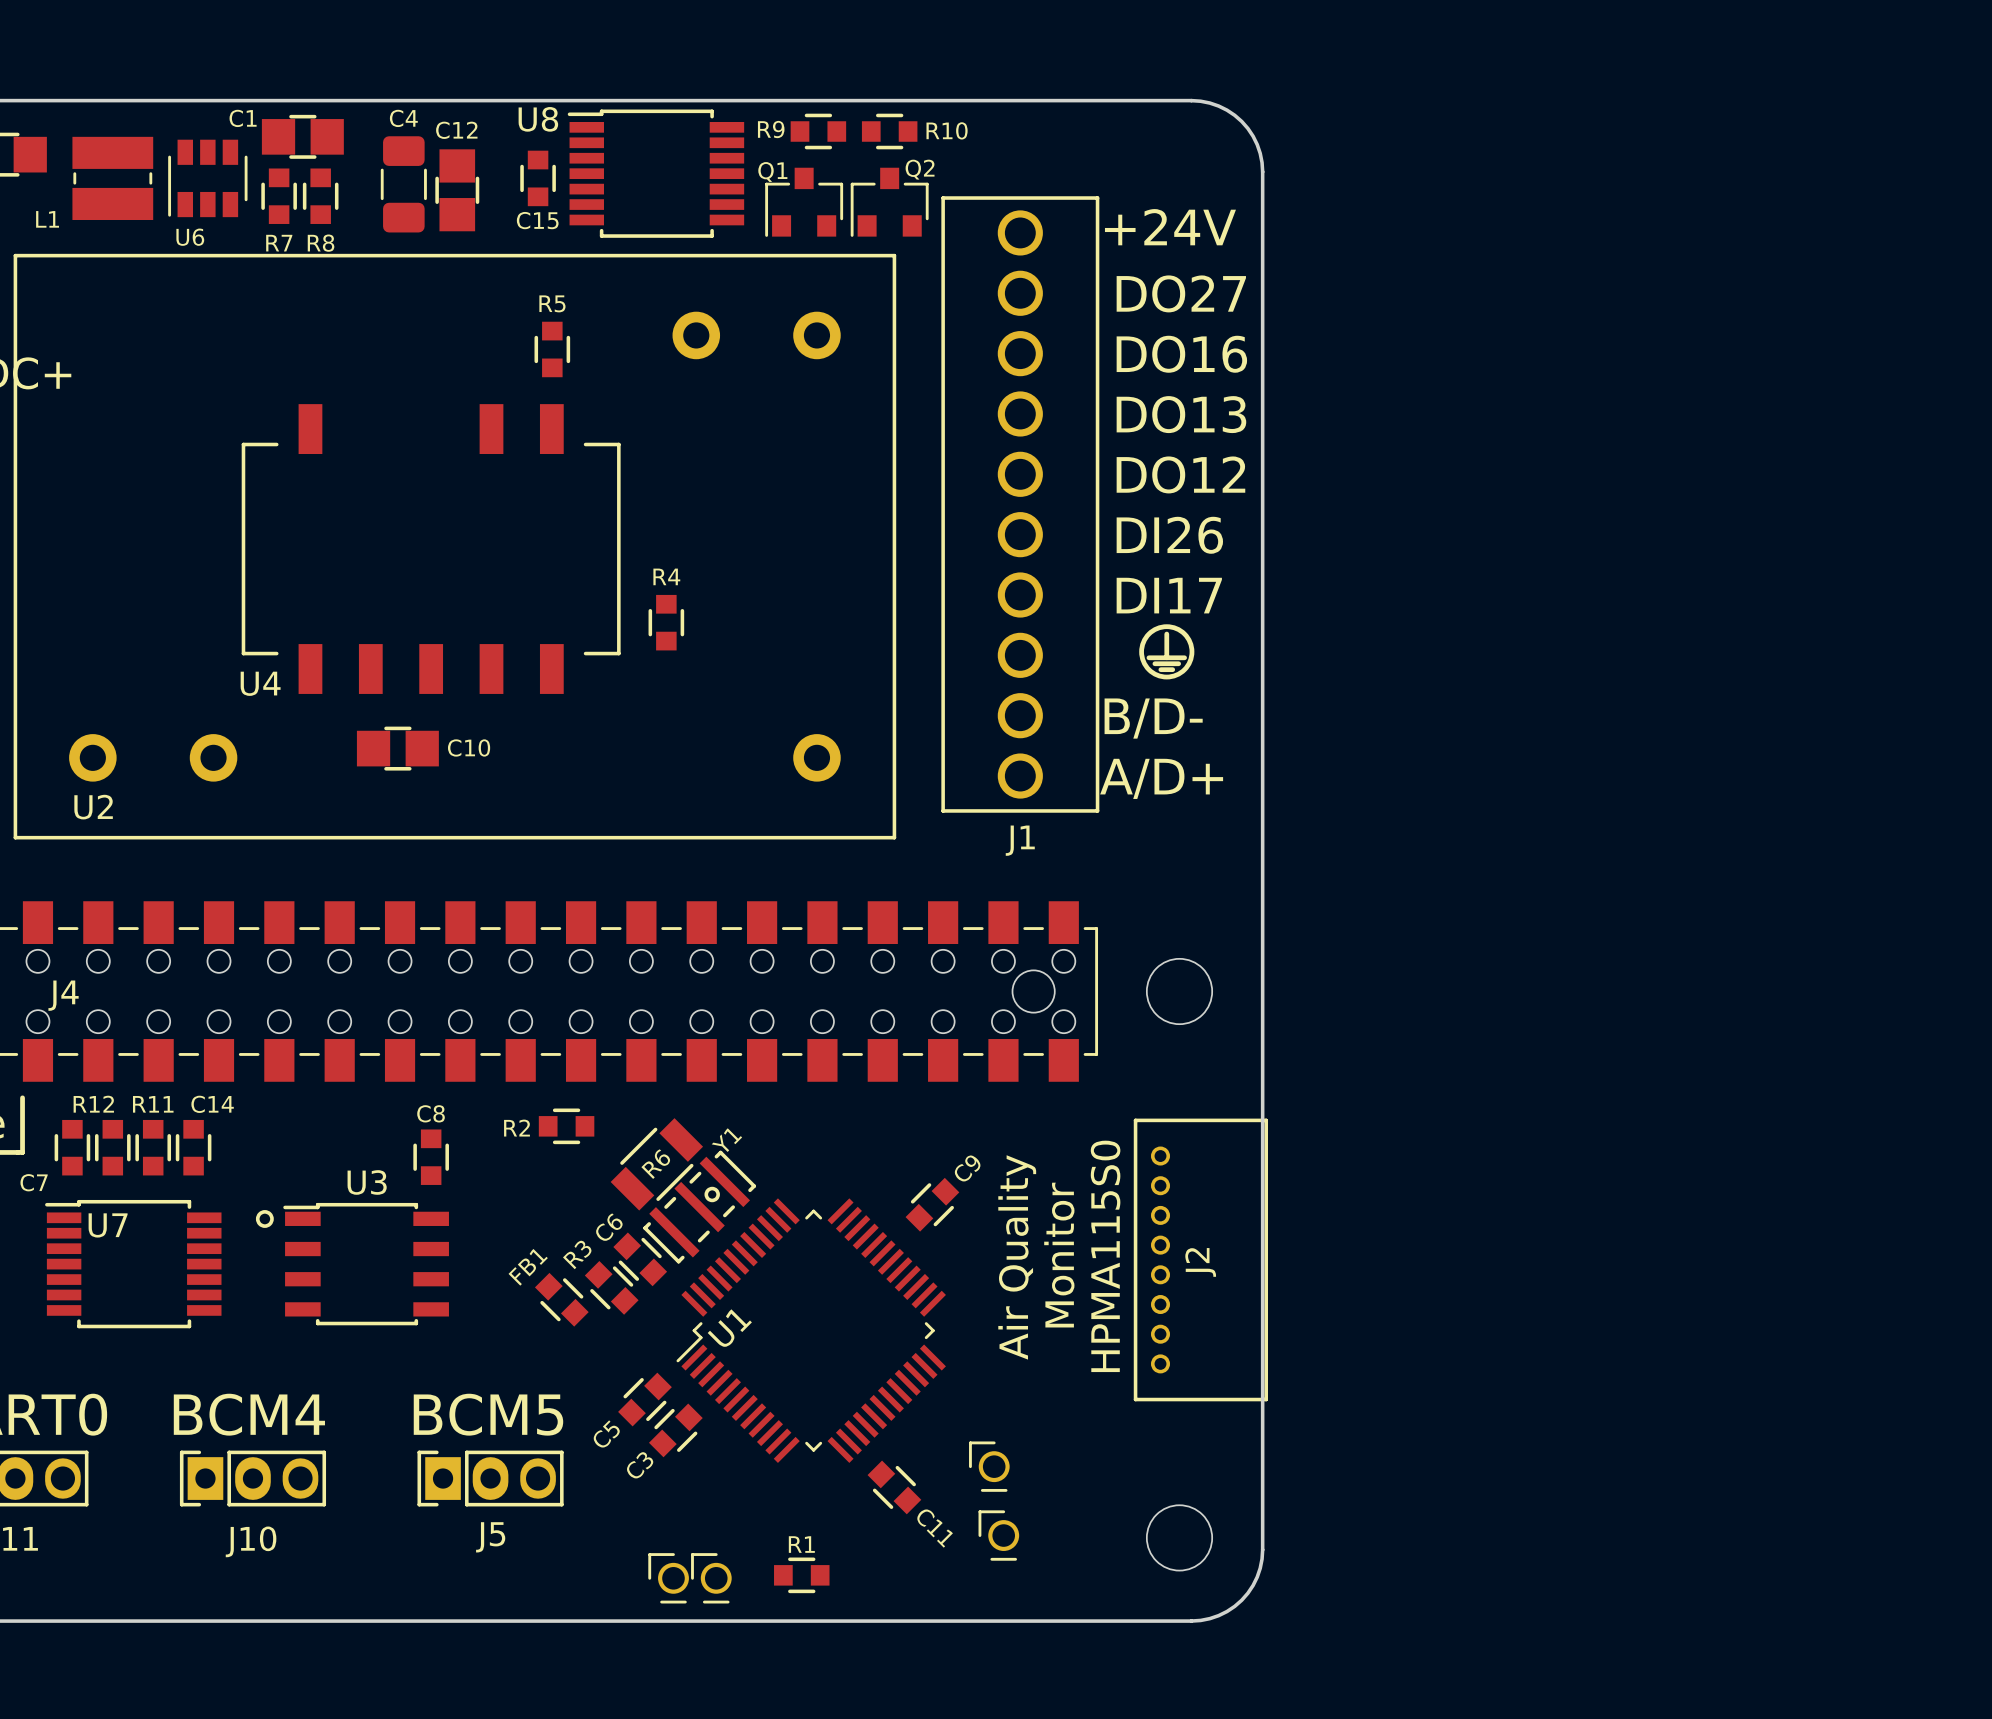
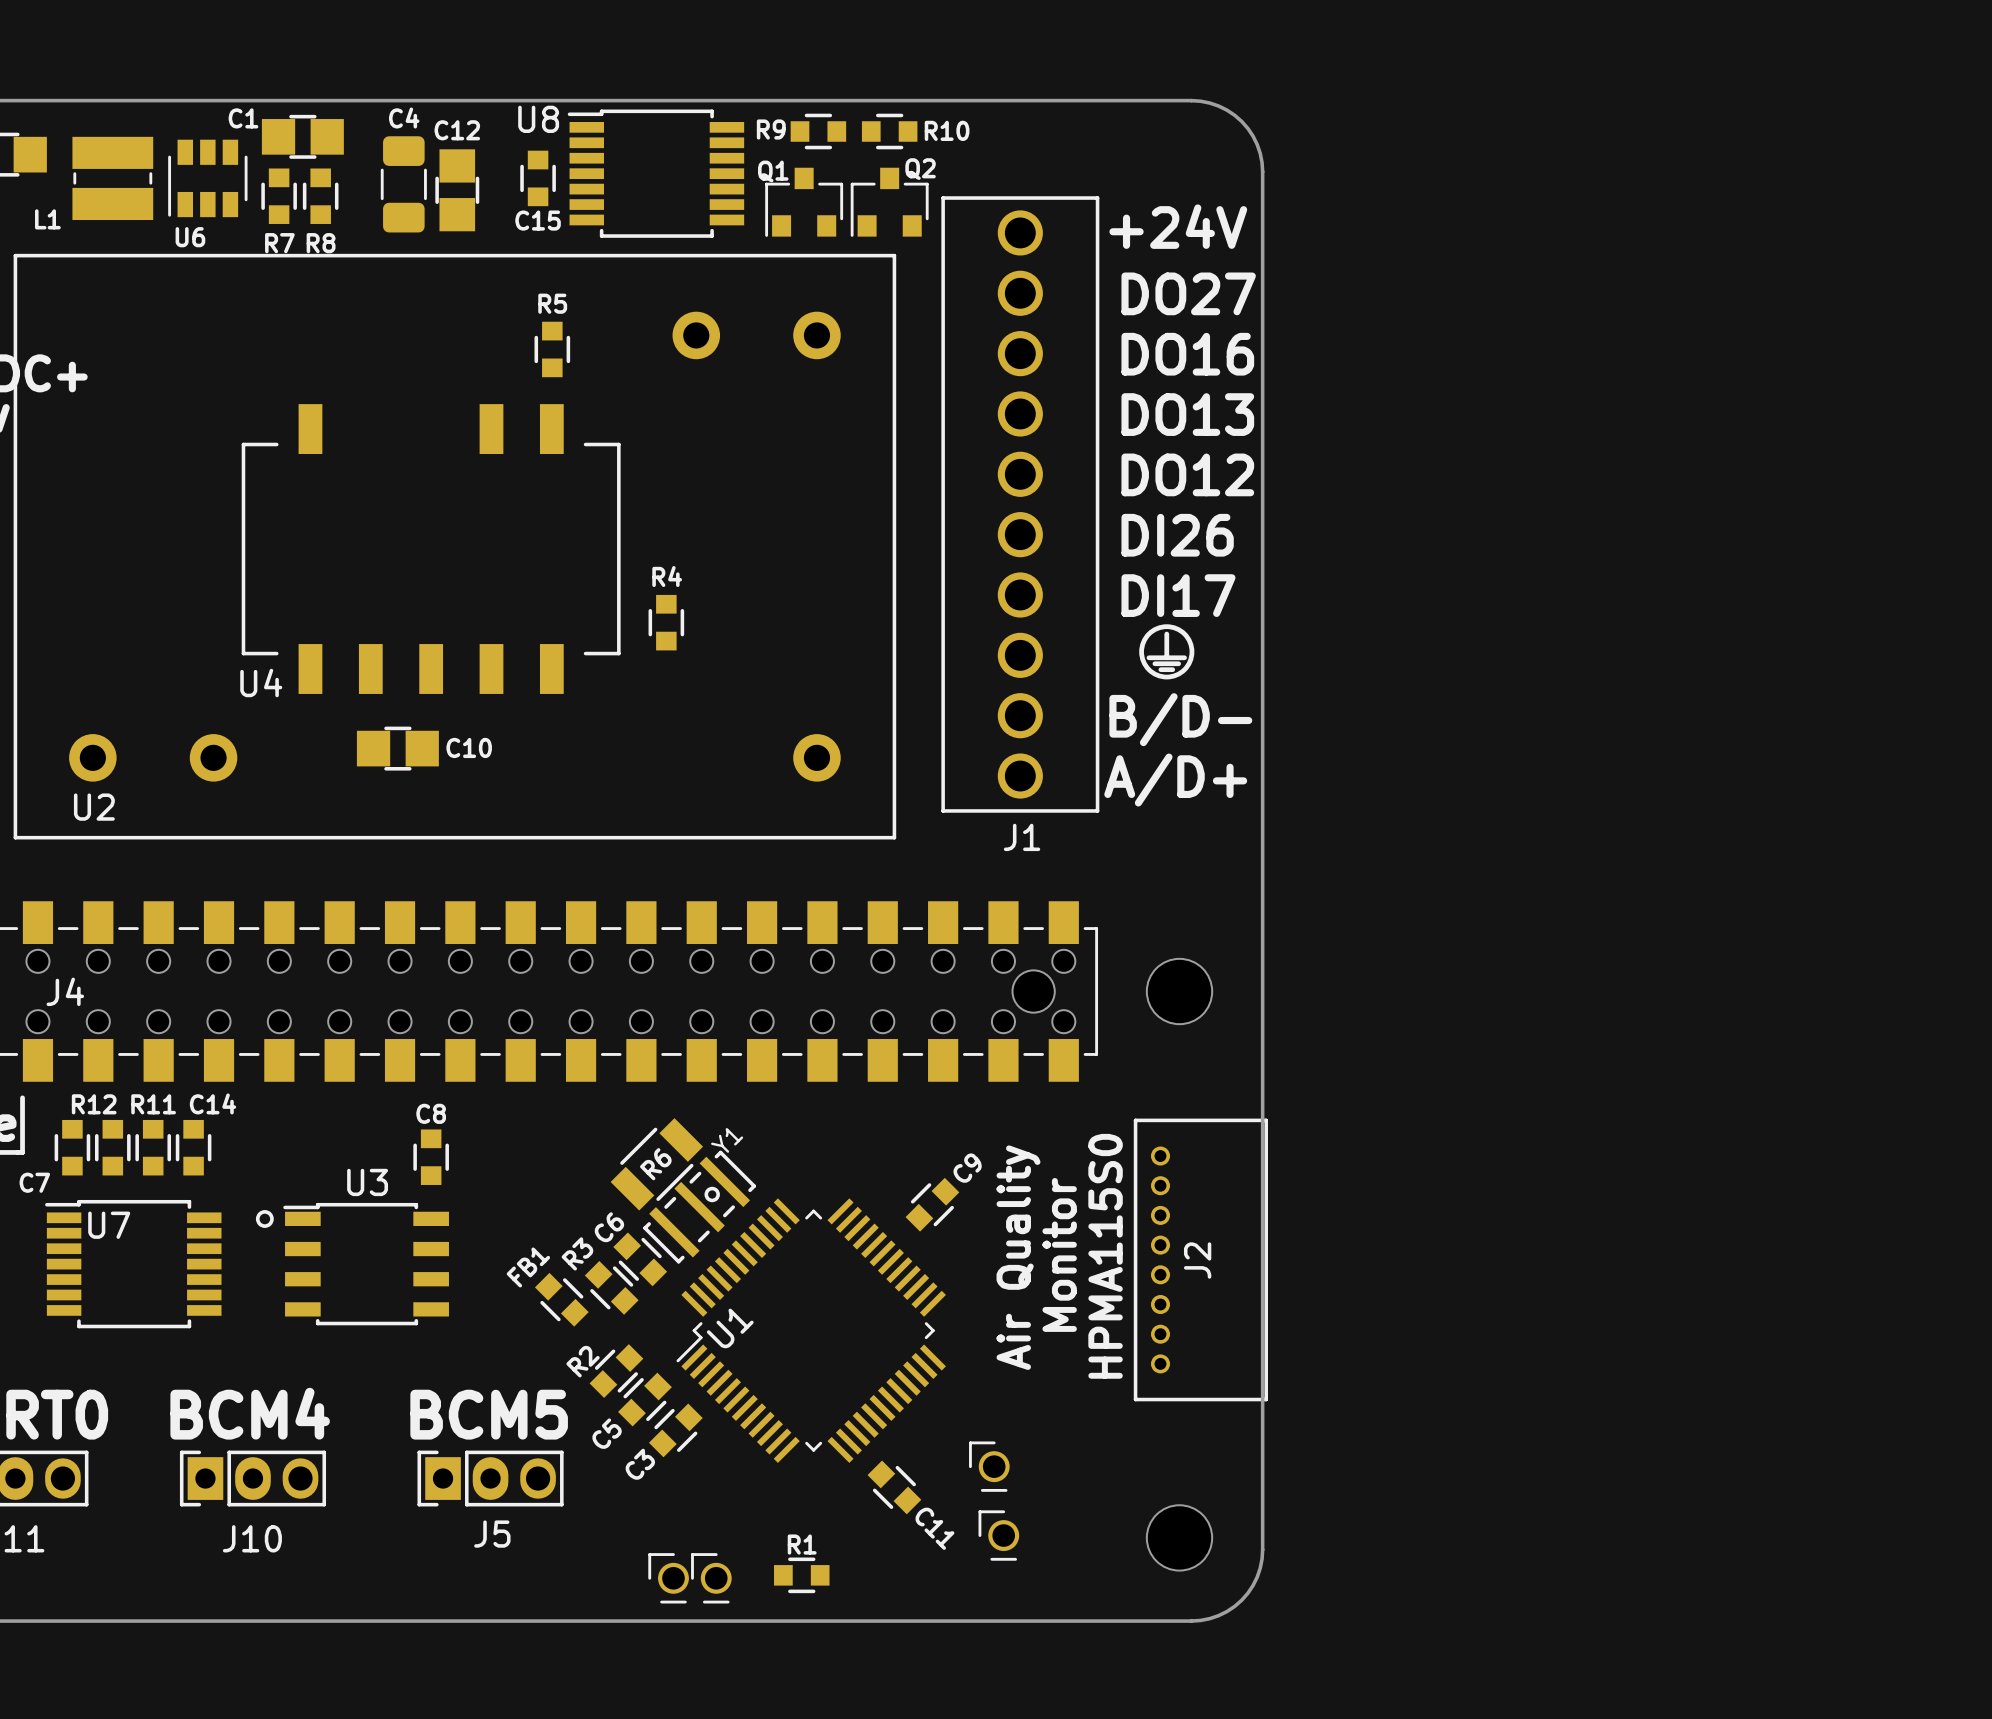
R2 rotation: 0° (566, 1126) -> 45° counterclockwise (616, 1371)
R2 position: (566, 1126) -> (616, 1371)

